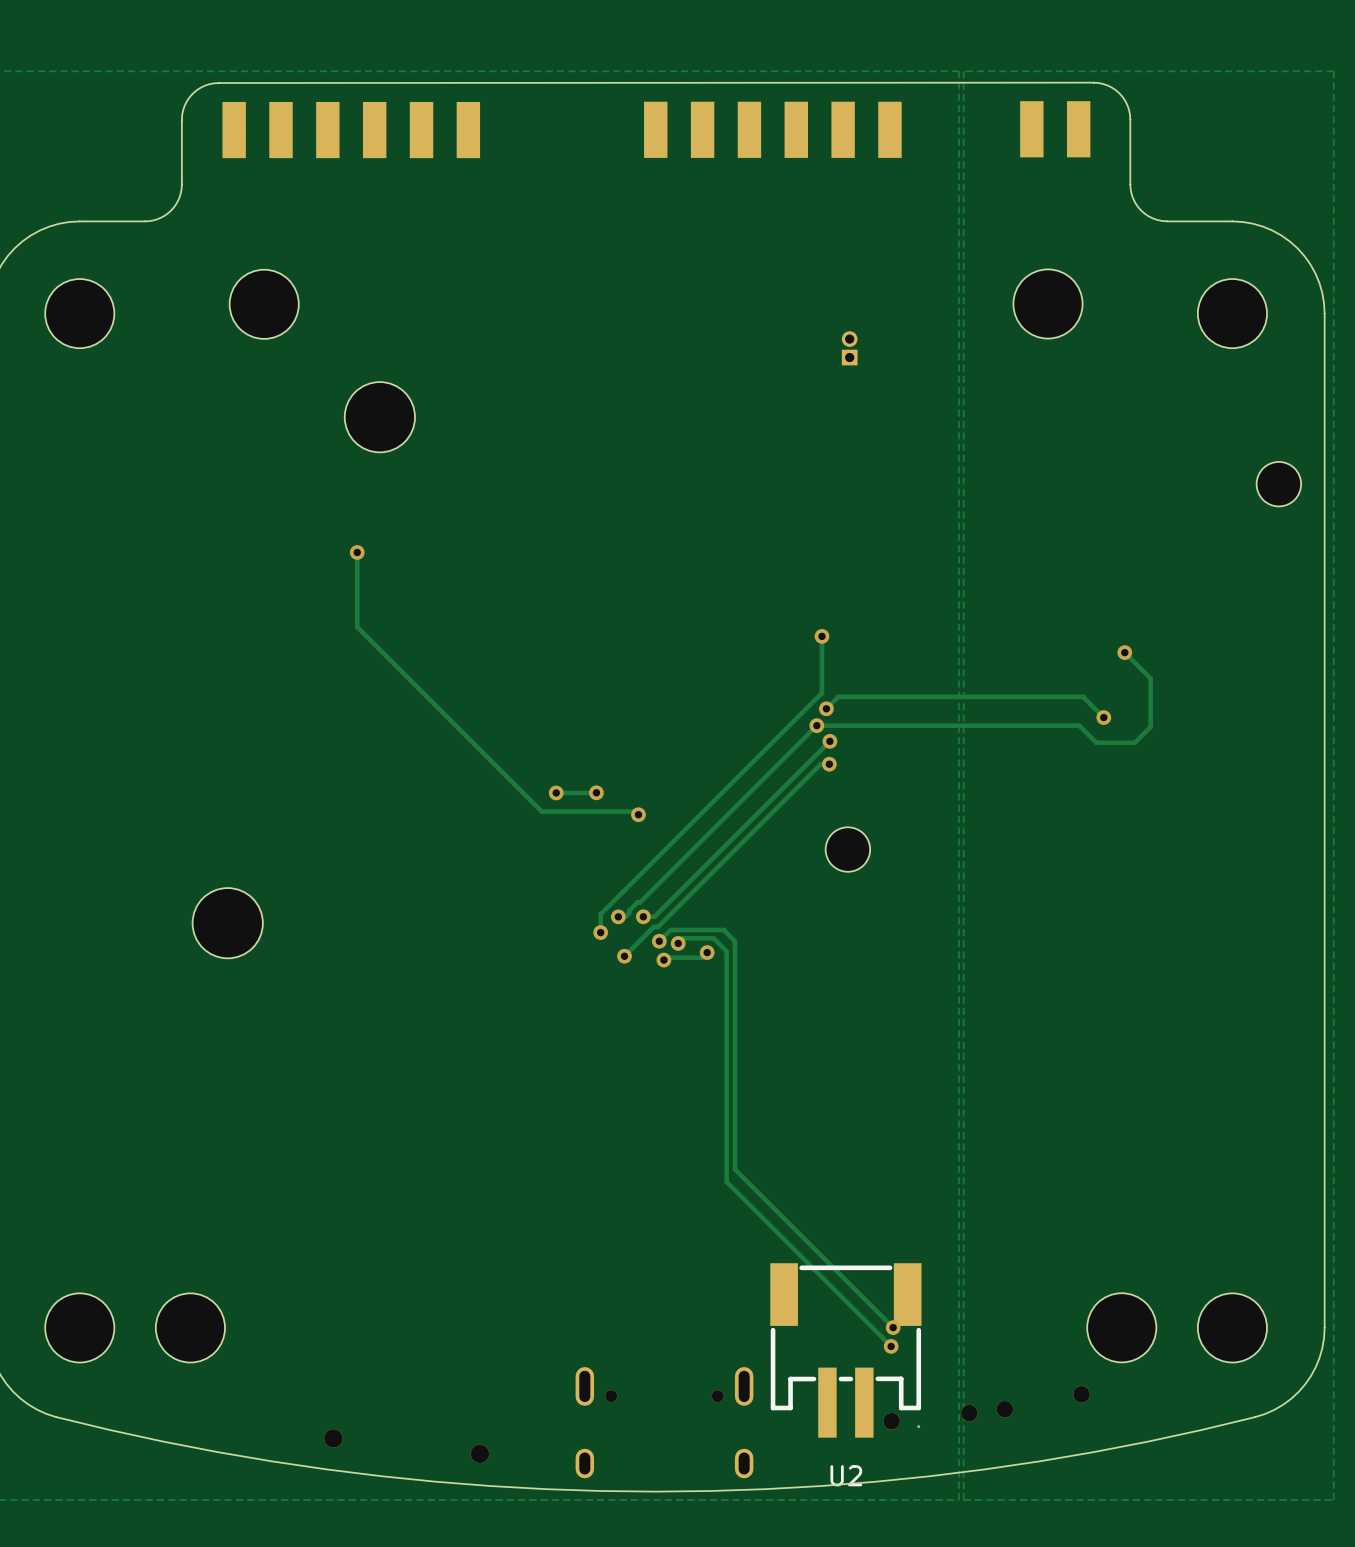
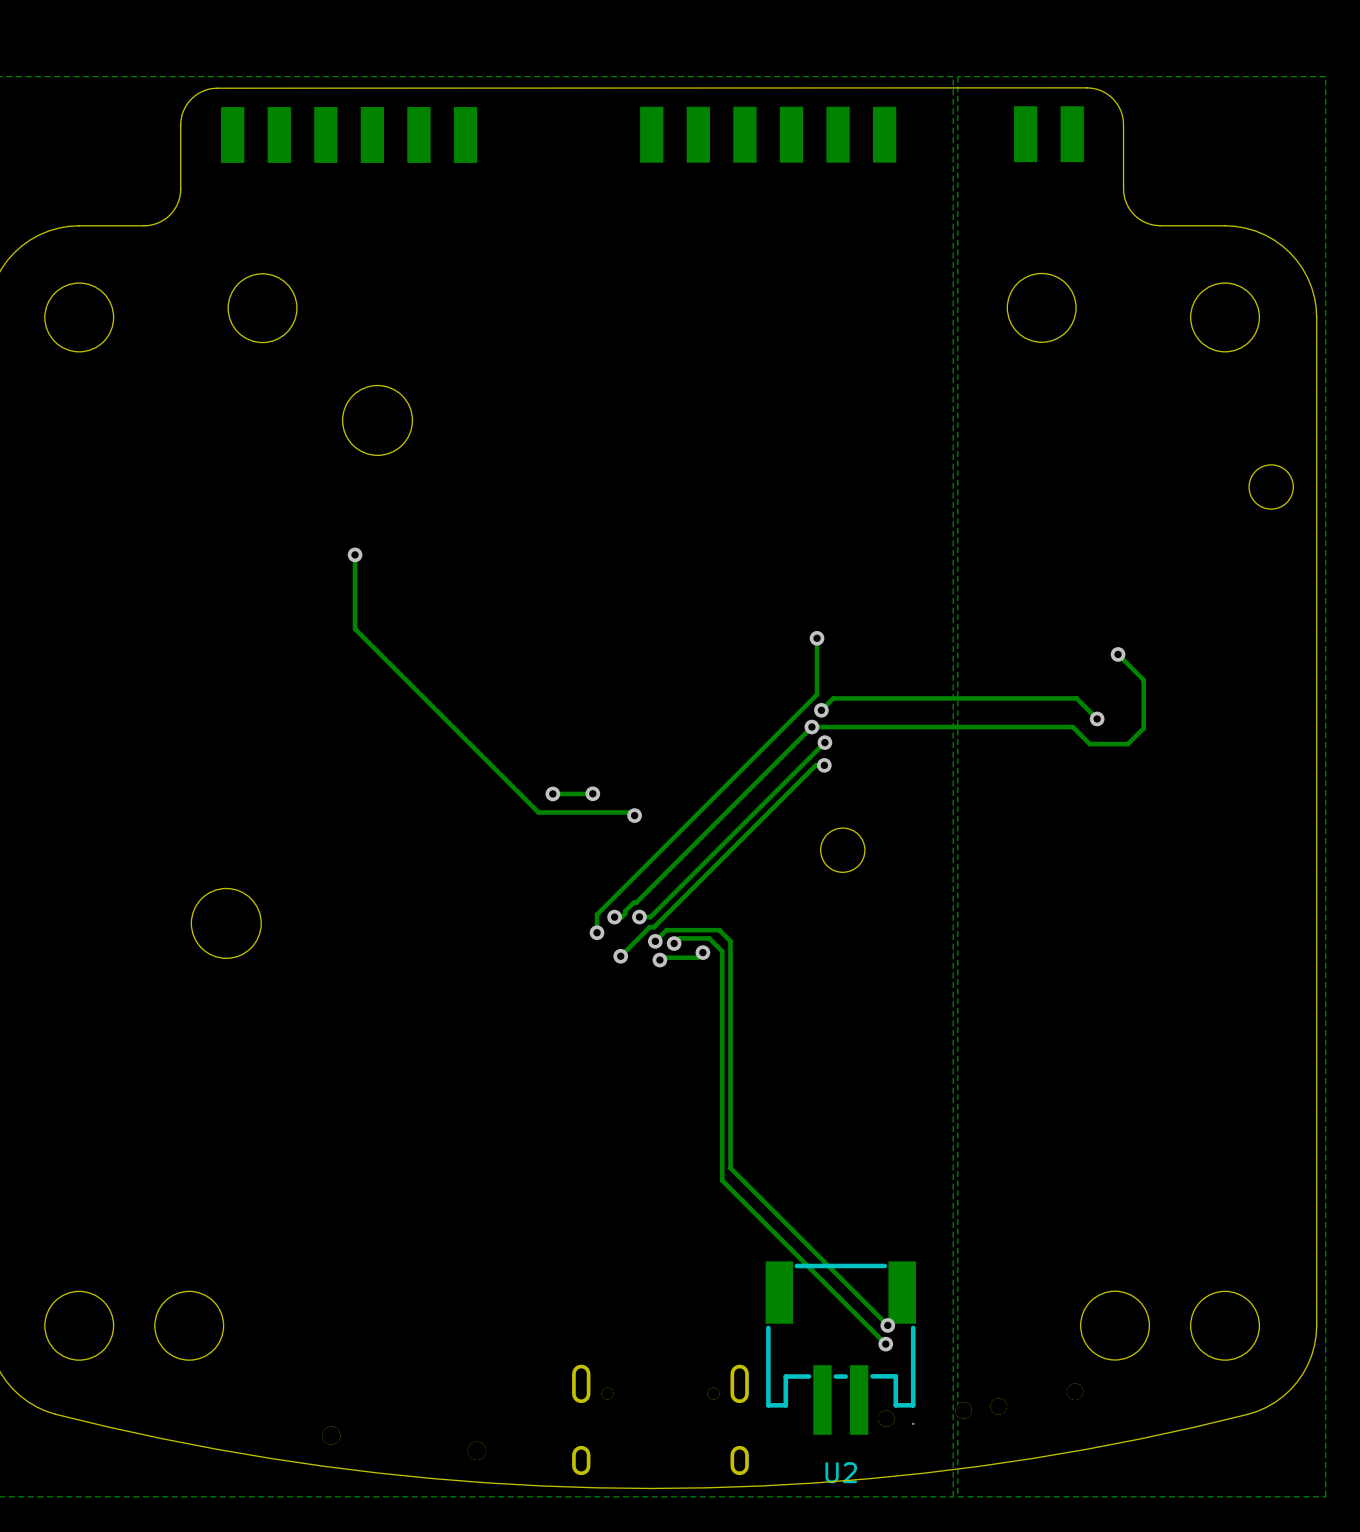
part: (849, 348) -> none

